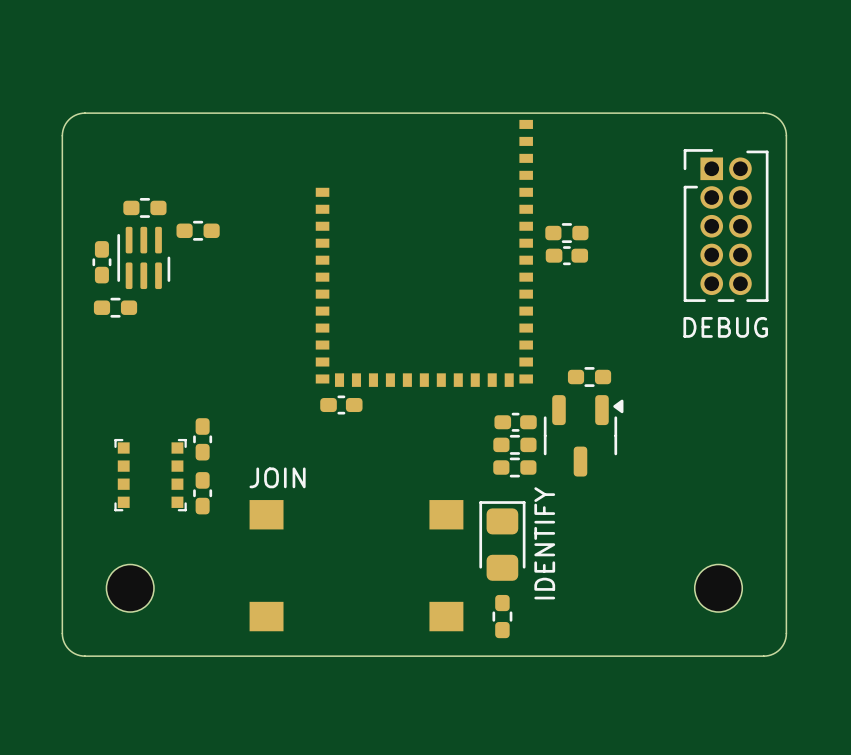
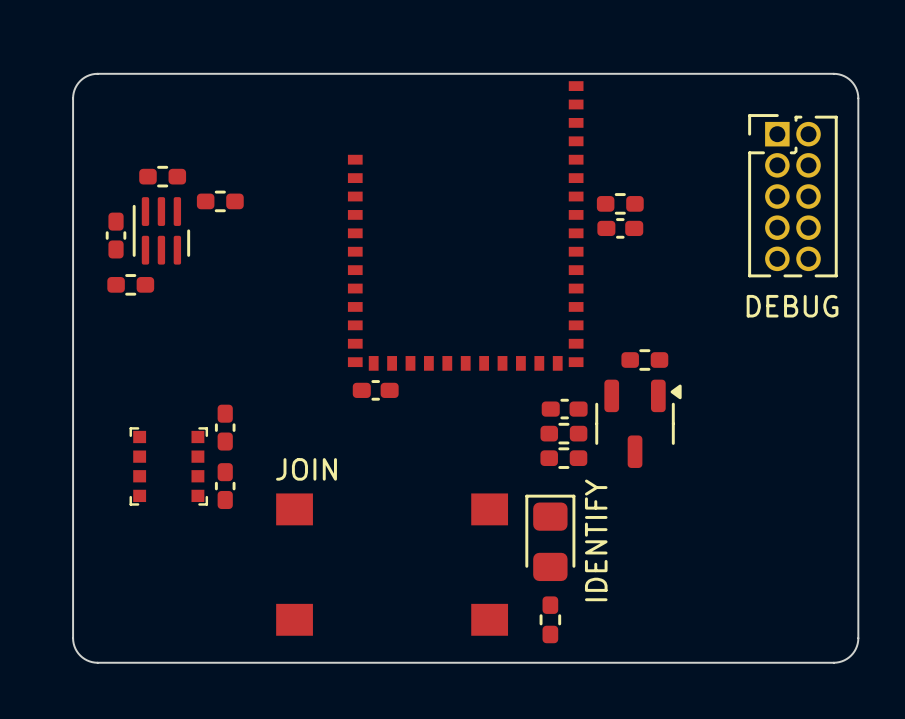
part footprint: [683, 149, 769, 302] -> [748, 114, 838, 278]
part: (130, 588) -> none
part: (718, 588) -> none

